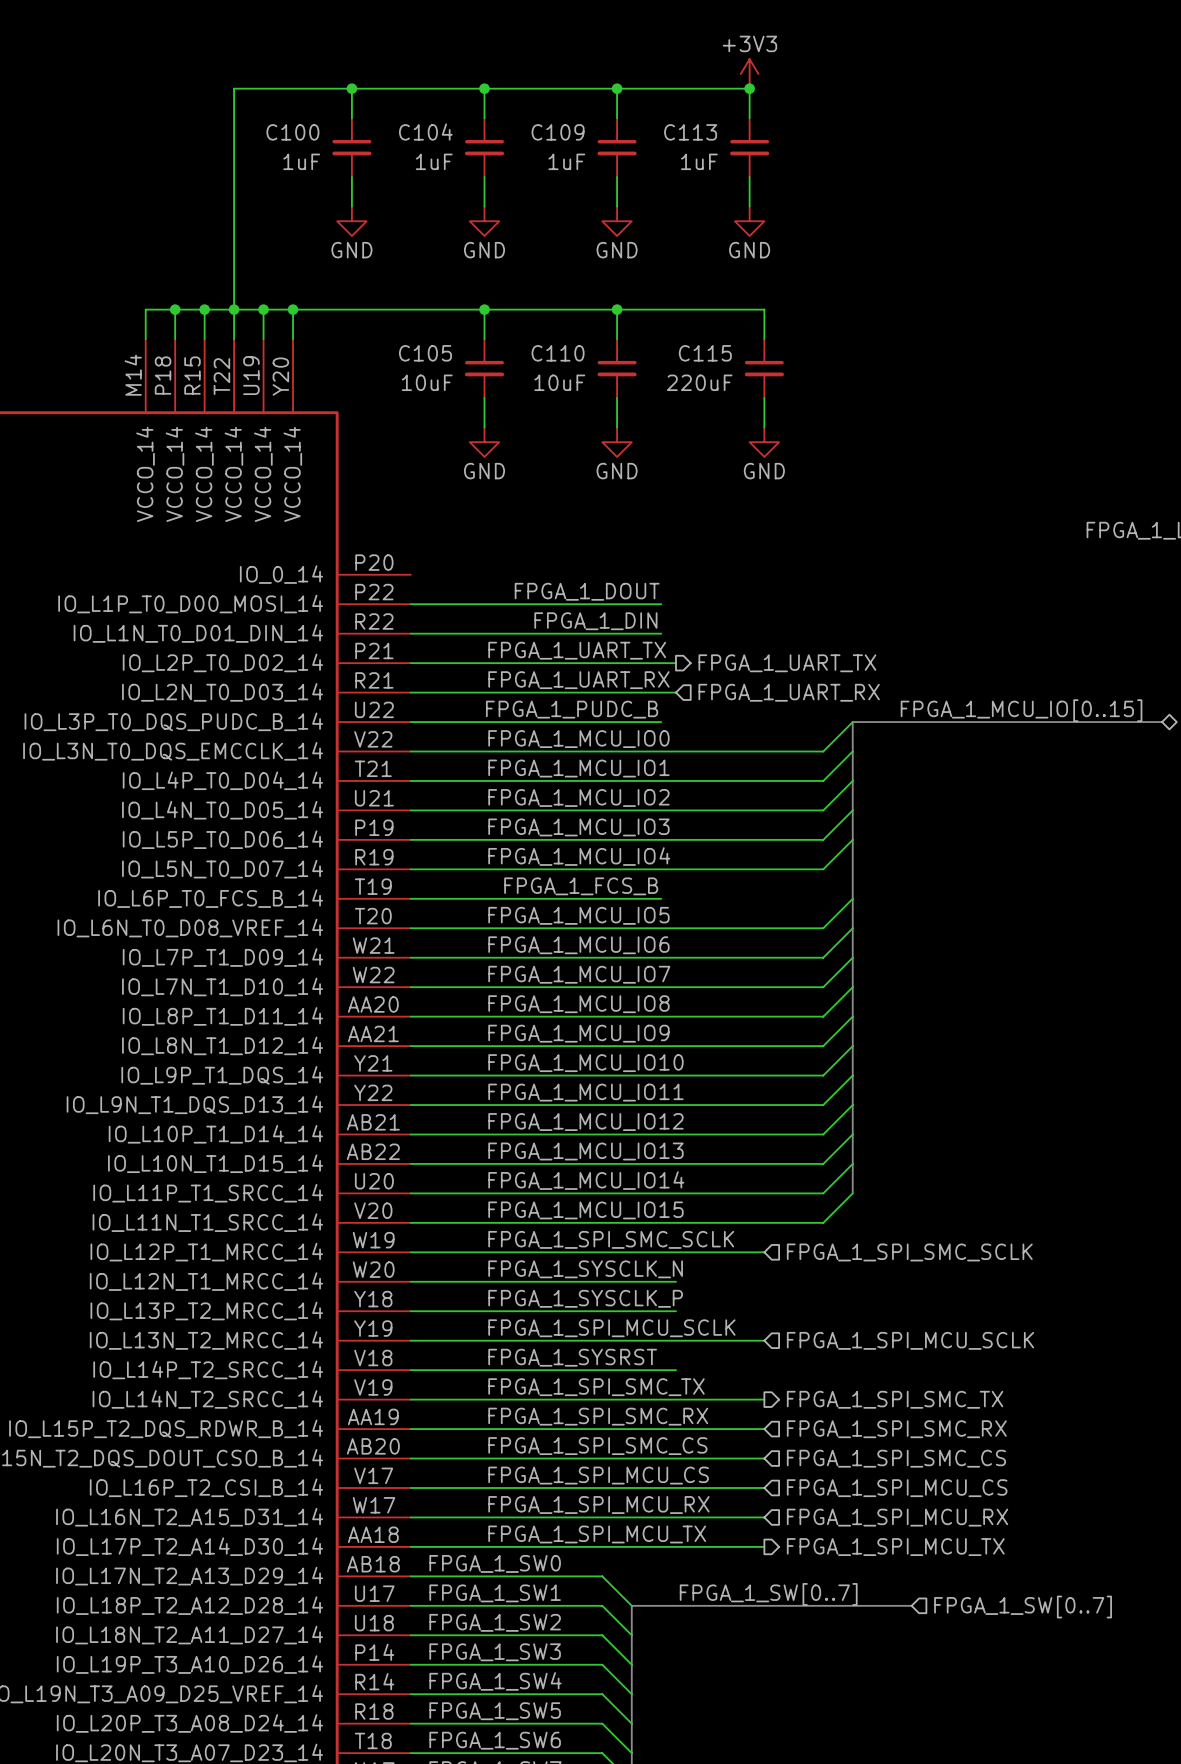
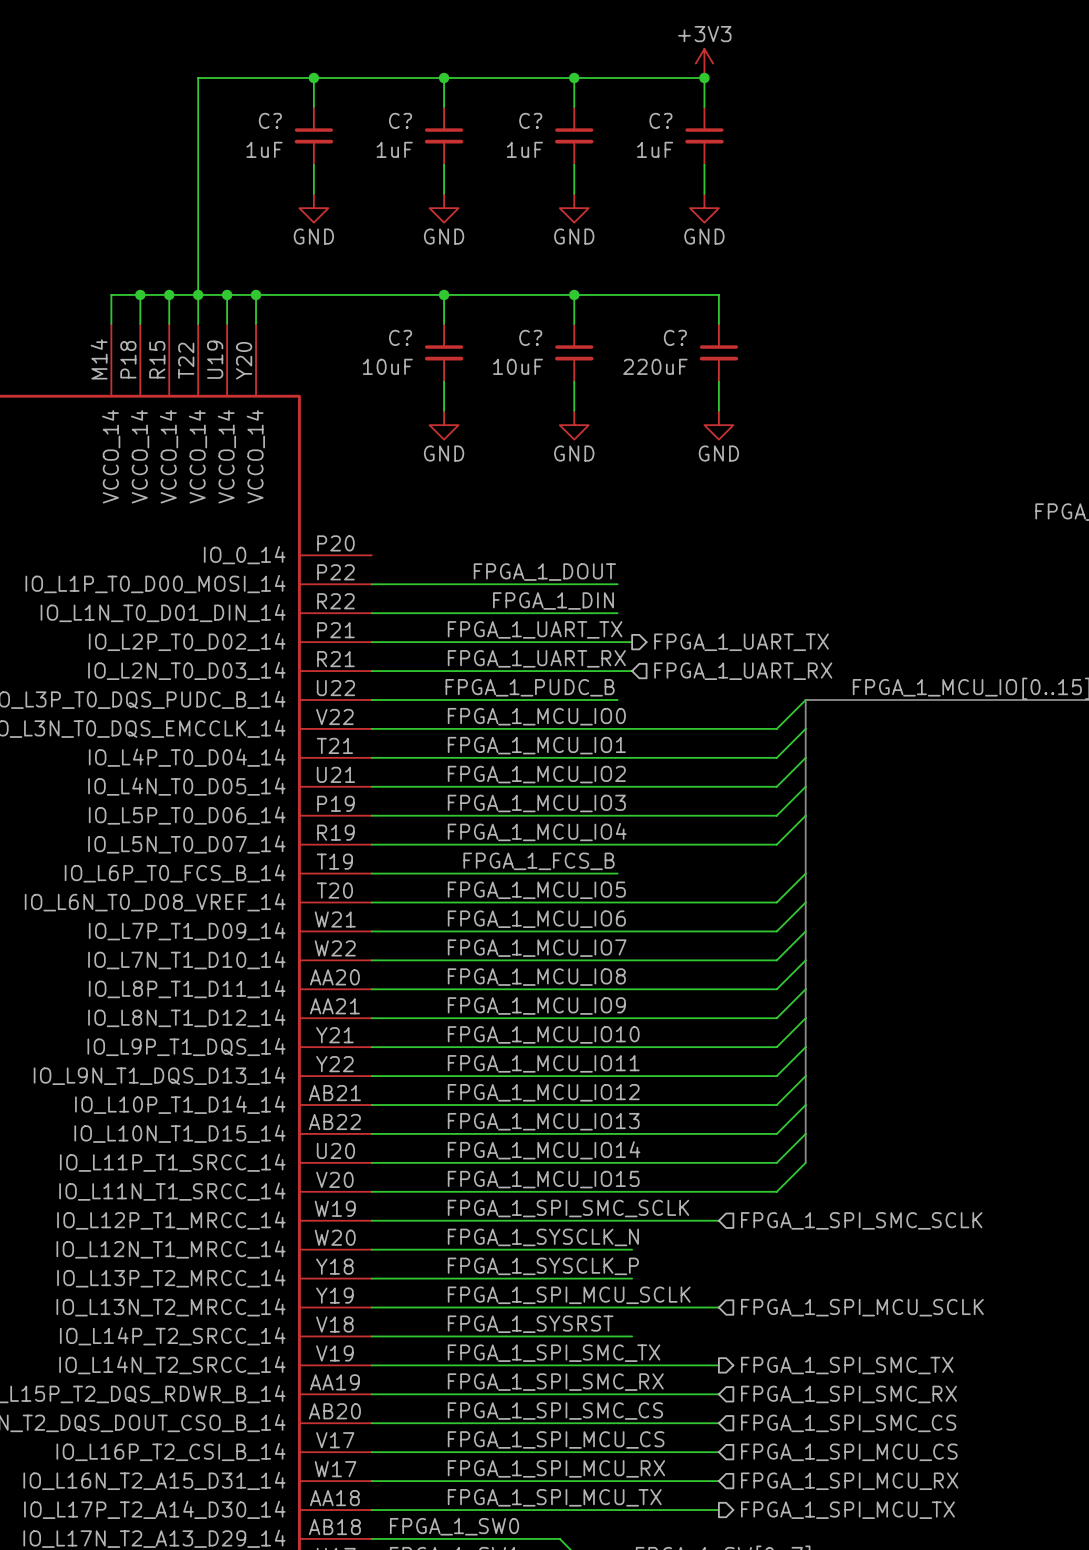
C100 name: C100 (292, 132) -> C? (270, 120)
C104 name: C104 (425, 132) -> C? (400, 120)
C109 name: C109 (558, 132) -> C? (530, 120)
C113 name: C113 (690, 132) -> C? (660, 120)
C105 name: C105 (425, 353) -> C? (400, 337)
C110 name: C110 (558, 353) -> C? (530, 337)
C115 name: C115 (705, 353) -> C? (675, 337)

